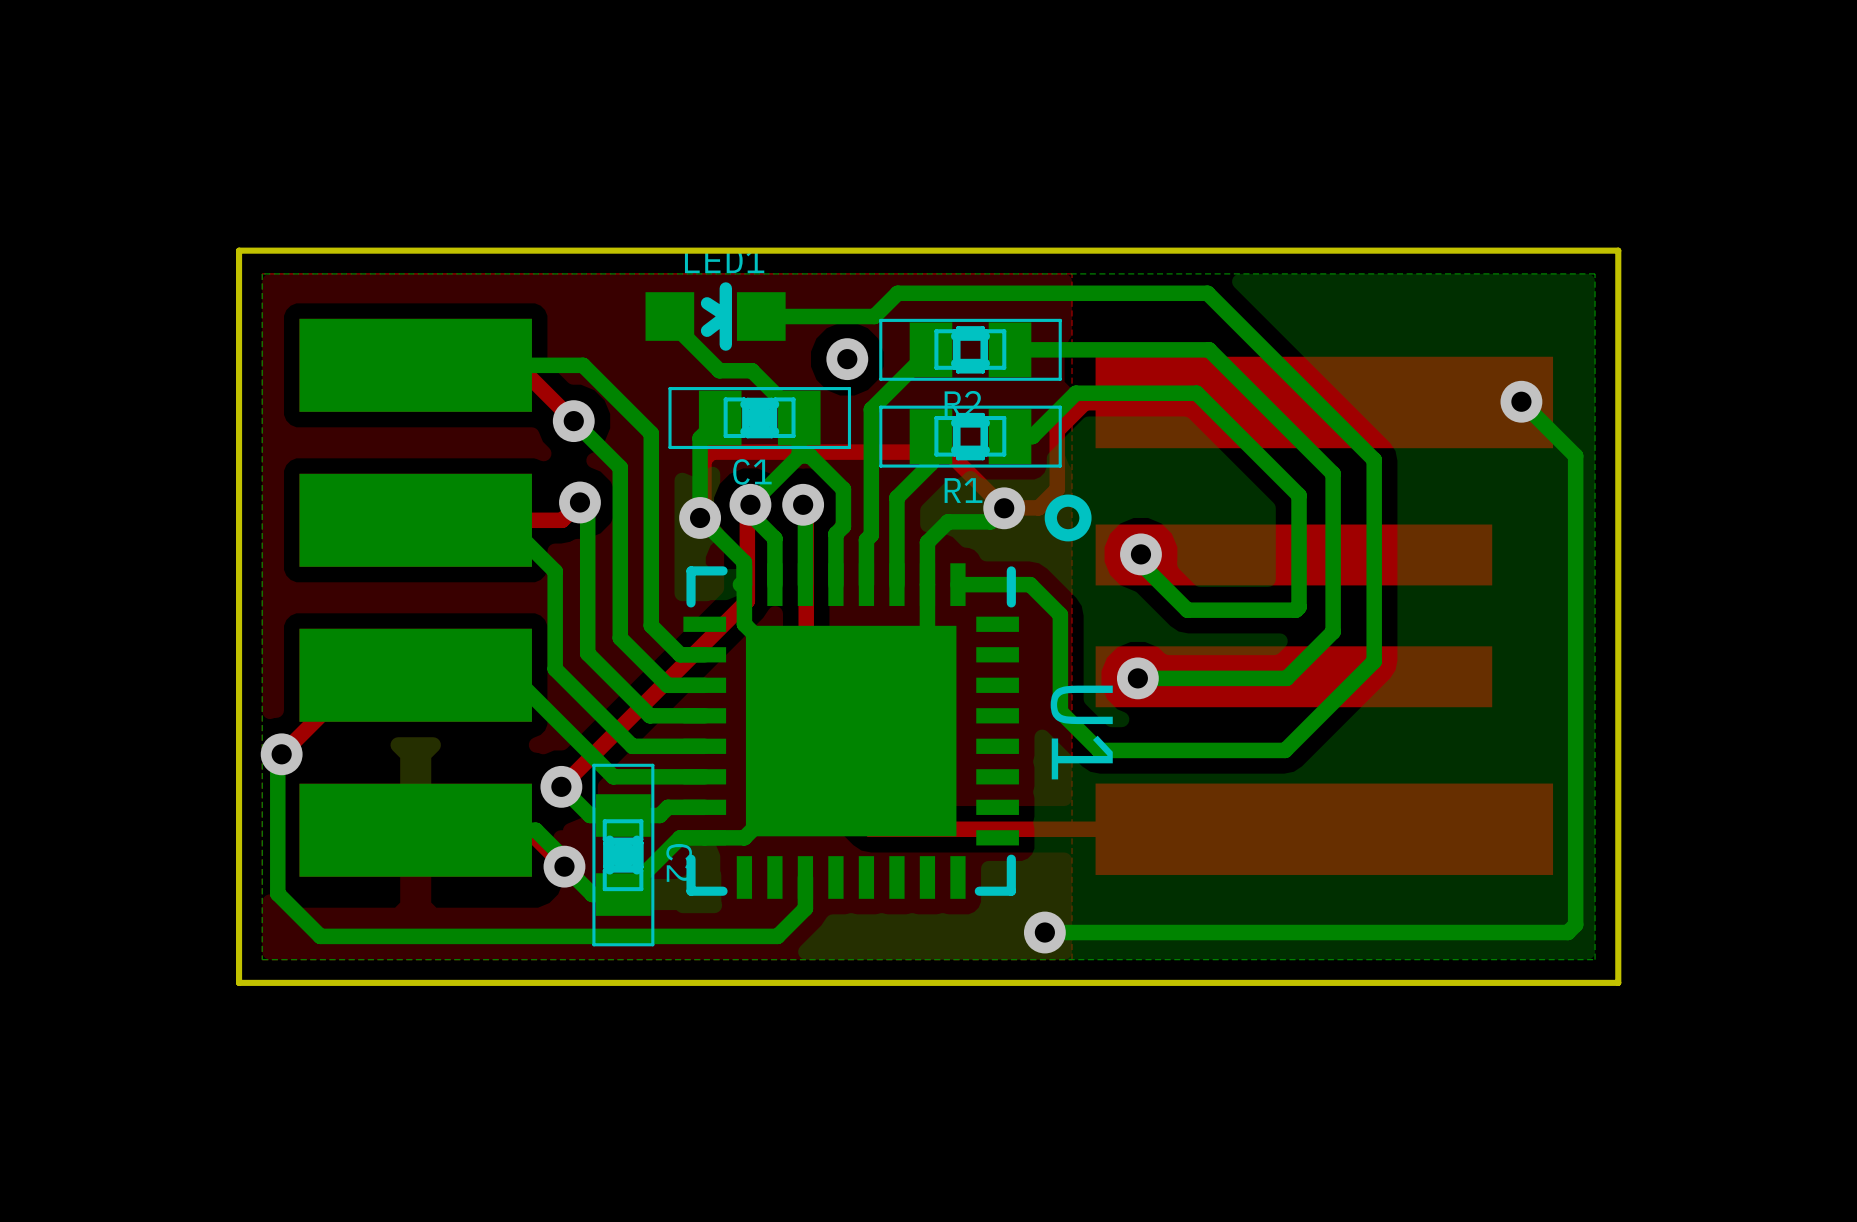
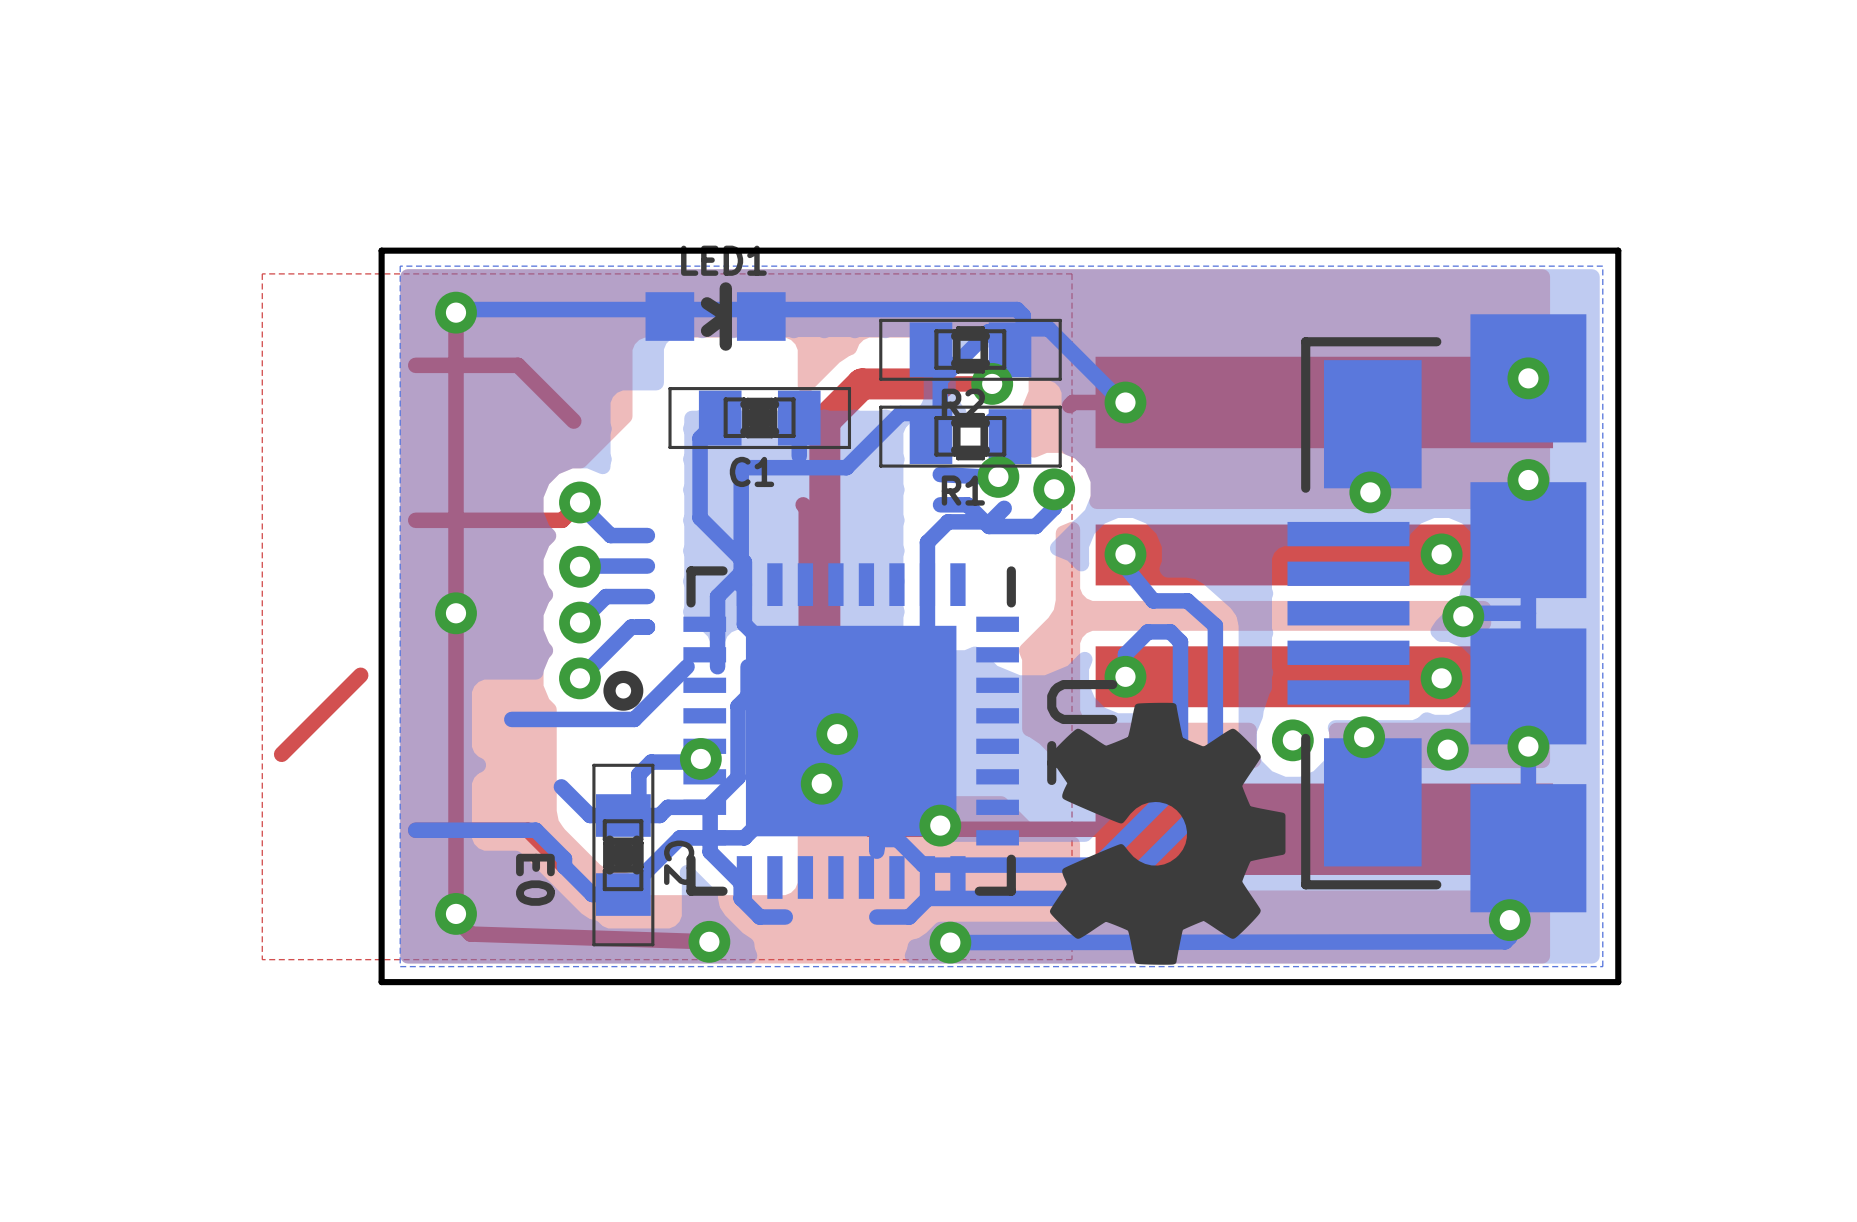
board edge: (381, 250) (239, 250) (239, 982) (1618, 982) -> (381, 250) (381, 982) (1618, 982)
bottom zone outline: (1595, 273) (1595, 959) (262, 959) (262, 273) (1595, 273) -> (1602, 266) (1602, 966) (400, 966) (400, 266) (1602, 266)
bottom track: none -> (456, 312) (459, 309) (1016, 309) (1023, 315) (1023, 328) (1048, 328) (1122, 402) (1125, 402)
top track: none -> (456, 312) (456, 919) (470, 934) (709, 941)
via: none -> (456, 312)
bottom track: (669, 316) (669, 321) (719, 370) (751, 370) (799, 418) -> none
bottom track: (761, 316) (874, 316) (897, 293) (1207, 293) (1374, 459) (1374, 661) (1285, 750) (1099, 750) (1060, 711) (1060, 614) (1030, 584) (957, 584) -> none
bottom track: none -> (1023, 331) (988, 331) (940, 380) (940, 413) (900, 413) (846, 467) (741, 467) (741, 572) (717, 596) (717, 666)
bottom track: (920, 349) (930, 349) (871, 409) (871, 535) (866, 539) (866, 584) -> none
bottom track: (1010, 349) (1209, 349) (1333, 473) (1333, 631) (1286, 678) (1137, 678) -> none
via: (847, 359) -> none
bottom track: (415, 365) (583, 365) (651, 433) (651, 625) (680, 654) (704, 654) -> none
top track: none -> (992, 383) (862, 383) (824, 421) (824, 675) (800, 700) (800, 762) (821, 783)
via: none -> (992, 383)
bottom track: (1521, 401) (1575, 455) (1575, 924) (1567, 932) (1044, 932) -> none
via position: (1521, 401) -> (1528, 378)
top track: (1085, 402) (1057, 430) (1057, 489) (1038, 507) (1004, 507) -> none
via: none -> (1125, 402)
bottom track: (573, 421) (620, 467) (620, 638) (667, 685) (704, 685) -> none
via: (573, 421) -> none
bottom track: (930, 436) (930, 463) (896, 497) (896, 584) -> none
bottom track: (1010, 436) (1032, 436) (1075, 393) (1196, 393) (1299, 495) (1299, 607) (1295, 610) (1187, 610) (1140, 563) (1140, 554) -> none
bottom track: none -> (940, 474) (997, 477)
bottom track: none -> (1528, 480) (1528, 901) (1509, 920) (1509, 937) (1505, 941) (950, 942)
via: none -> (1528, 480)
bottom track: none -> (1054, 489) (1054, 507) (1035, 526) (989, 526) (967, 504) (940, 504)
via: none -> (1054, 489)
via: none -> (1370, 492)
drawing: [1044, 494, 1092, 542] -> none
bottom track: (579, 502) (587, 510) (587, 653) (649, 715) (704, 715) -> (579, 504) (610, 535) (647, 535)
top track: (750, 504) (747, 507) (747, 600) (561, 786) -> none
via: (750, 504) -> none
bottom track: (803, 504) (805, 507) (805, 584) -> none
via: (803, 504) -> none
top track: (1004, 508) (948, 452) (711, 452) (703, 459) (703, 514) (700, 517) -> none
via position: (1004, 508) -> (998, 476)
via: (700, 517) -> none
bottom track: (504, 520) (555, 571) (555, 669) (632, 746) (704, 746) -> none
bottom track: none -> (1125, 554) (1125, 566) (1153, 600) (1187, 600) (1215, 625) (1215, 794) (1111, 898) (927, 898) (909, 917) (876, 917)
via position: (1140, 554) -> (1125, 554)
via: none -> (1441, 554)
via: none -> (579, 566)
bottom track: none -> (647, 566) (580, 566)
bottom track: (835, 584) (835, 534) (843, 526) (843, 489) (810, 455) (799, 455) (750, 504) (750, 514) (774, 538) (774, 584) -> none
bottom track: none -> (647, 596) (605, 596) (579, 622)
part: (415, 597) -> none
via: none -> (456, 613)
part: none -> (1436, 613)
bottom track: none -> (1528, 613) (1466, 613) (1463, 616)
via: none -> (1463, 616)
via: none -> (579, 622)
bottom track: none -> (647, 627) (631, 627) (579, 678)
bottom track: none -> (687, 666) (634, 719) (511, 719)
bottom track: none -> (748, 666) (748, 696) (738, 706) (738, 777) (710, 805) (710, 851) (741, 882) (741, 898) (759, 917) (785, 917)
drawing: none -> [603, 670, 644, 711]
bottom track: (415, 675) (511, 675) (613, 776) (704, 776) -> none
bottom track: none -> (1125, 676) (1125, 654) (1147, 631) (1170, 631) (1180, 641) (1180, 782) (1097, 865) (923, 865) (897, 839) (876, 839) (876, 851)
via: none -> (579, 678)
via position: (1137, 678) -> (1125, 676)
via: none -> (1441, 678)
drawing: none -> [1049, 702, 1286, 965]
via: none -> (837, 734)
via: none -> (1364, 737)
via: none -> (1292, 740)
via: none -> (1528, 746)
via: none -> (1447, 749)
bottom track: (281, 754) (277, 758) (277, 893) (320, 936) (777, 936) (805, 908) (805, 877) -> none
via: (281, 754) -> none
bottom track: none -> (700, 758) (697, 762) (651, 762) (638, 774) (638, 806)
via: none -> (700, 758)
via: none -> (821, 783)
via: (561, 786) -> none
via: none -> (940, 825)
via: (564, 866) -> none
text: none -> E0 (535, 879)
via: none -> (456, 913)
via: none -> (1509, 920)
via: (1044, 932) -> none
via: none -> (709, 941)
via: none -> (950, 942)

